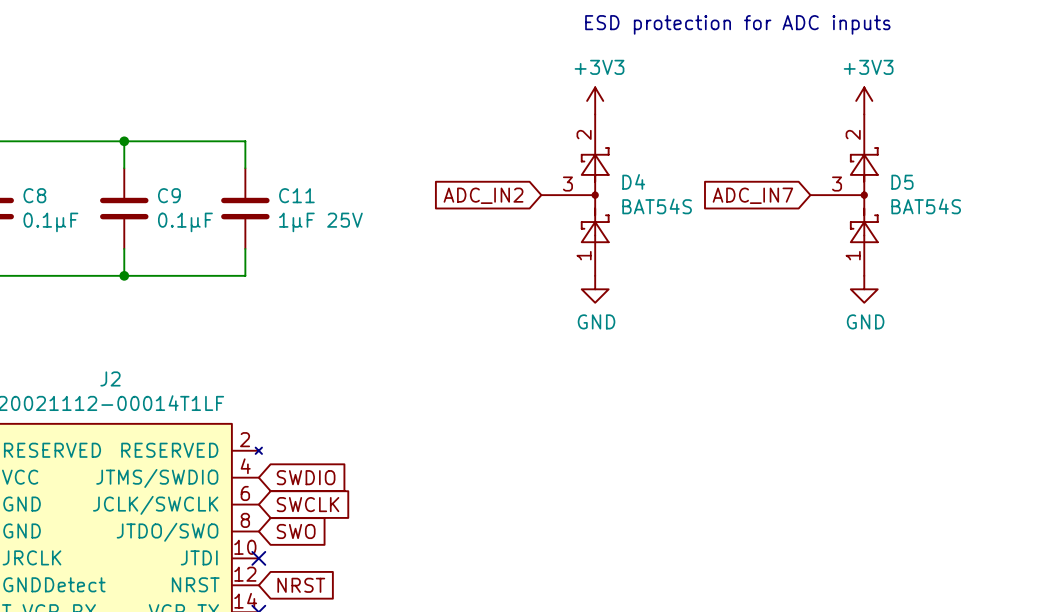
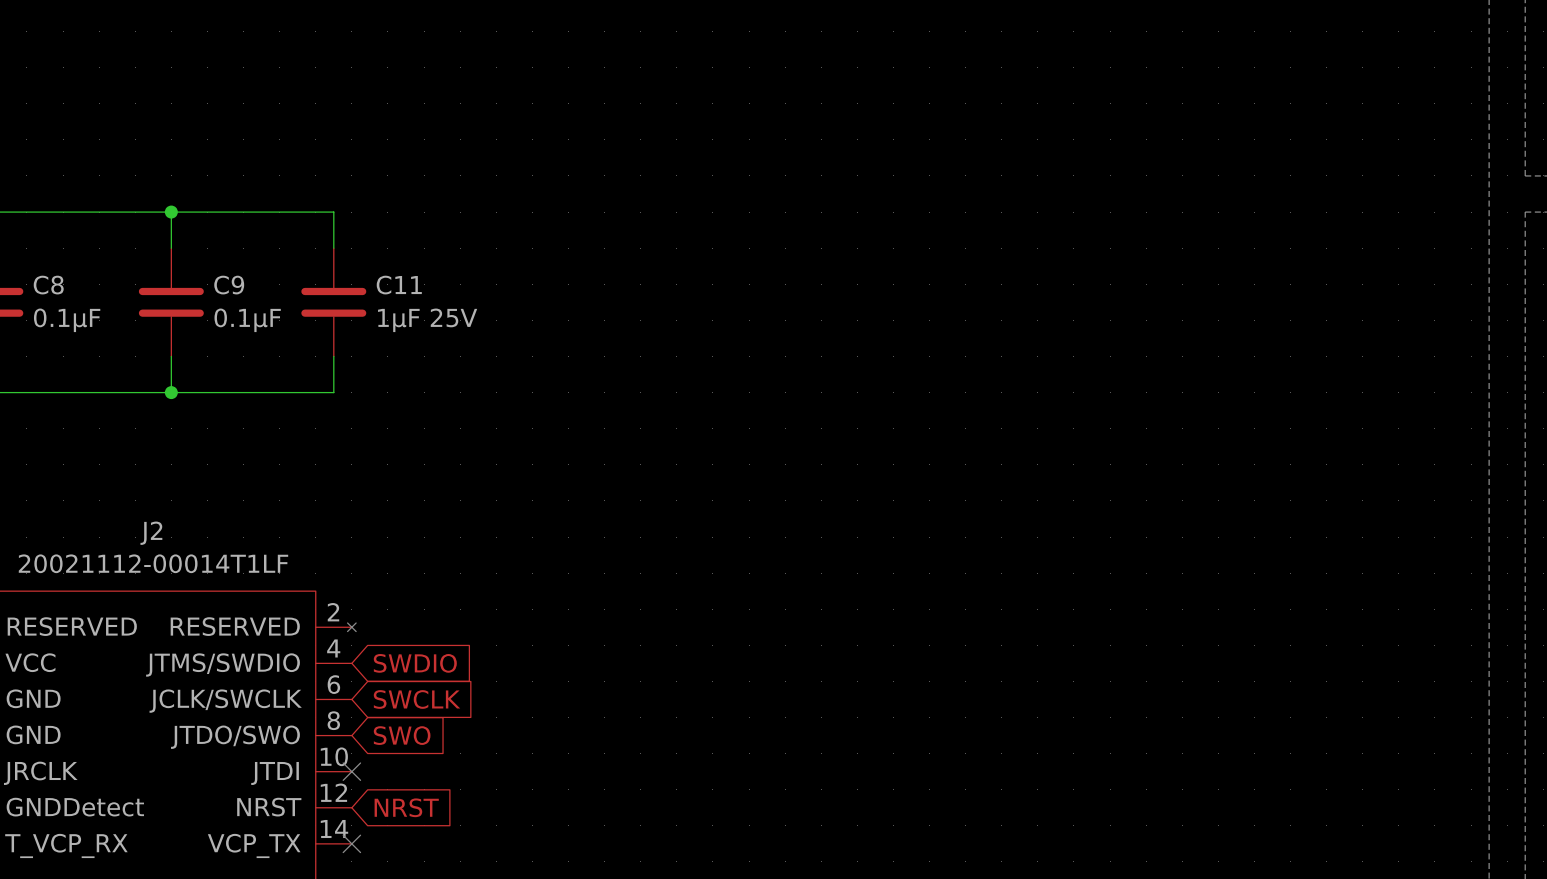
text: ESD protection for ADC inputs (737, 24) -> none
power symbol: +3V3 (595, 100) -> none
power symbol: +3V3 (864, 100) -> none
global label: ADC_IN2 (483, 195) -> none
D4: BAT54S (575, 195) -> none
global label: ADC_IN7 (752, 195) -> none
D5: BAT54S (844, 195) -> none
power symbol: GND (595, 289) -> none
power symbol: GND (864, 289) -> none

